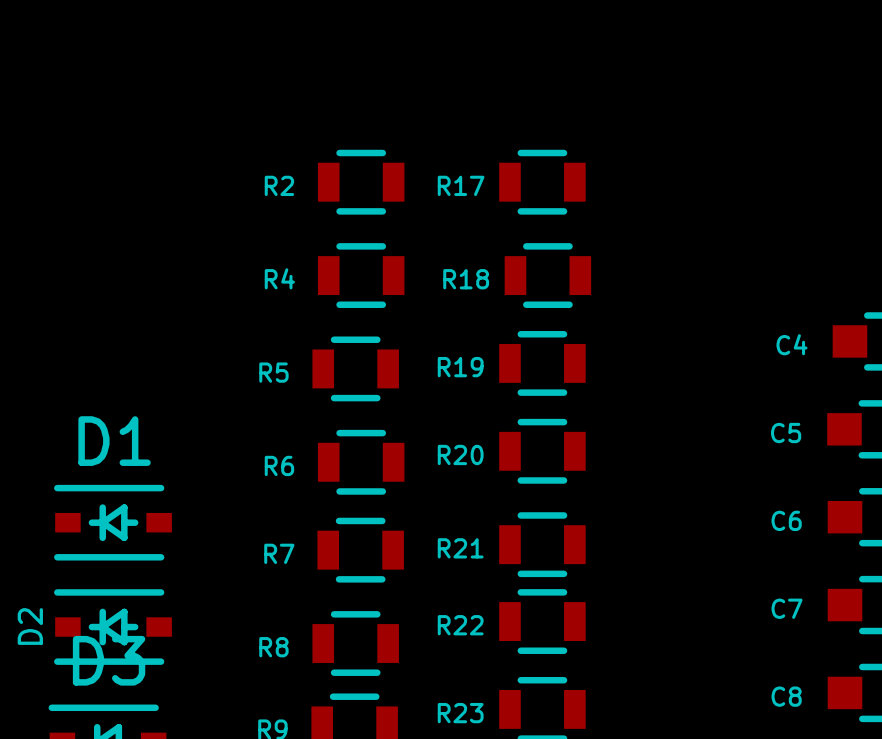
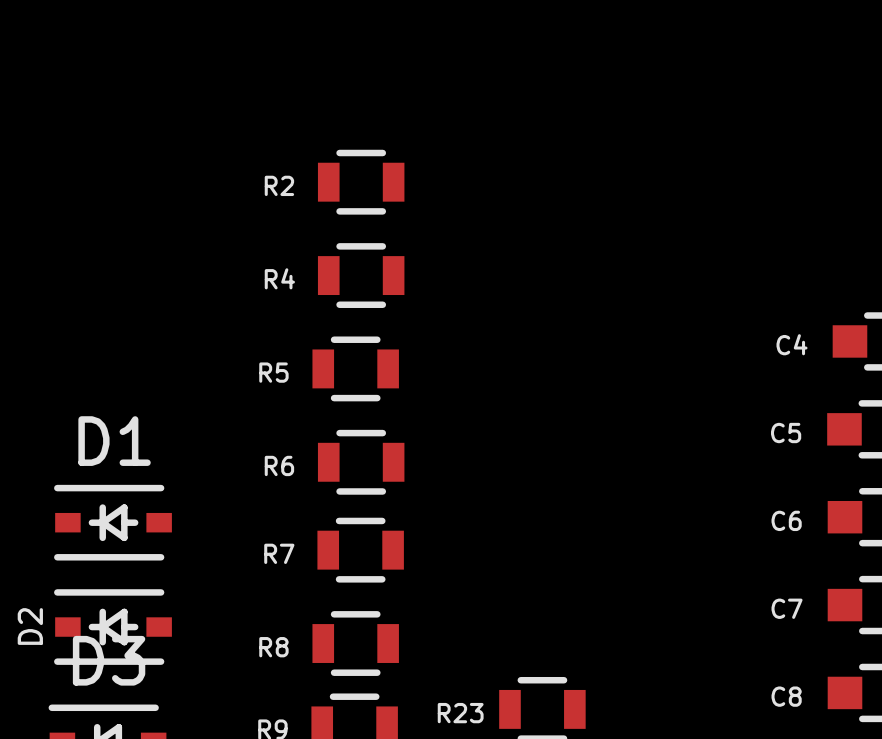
R17: (542, 182) -> none
R18: (547, 275) -> none
R19: (542, 363) -> none
R20: (542, 451) -> none
R21: (542, 544) -> none
R22: (542, 621) -> none

